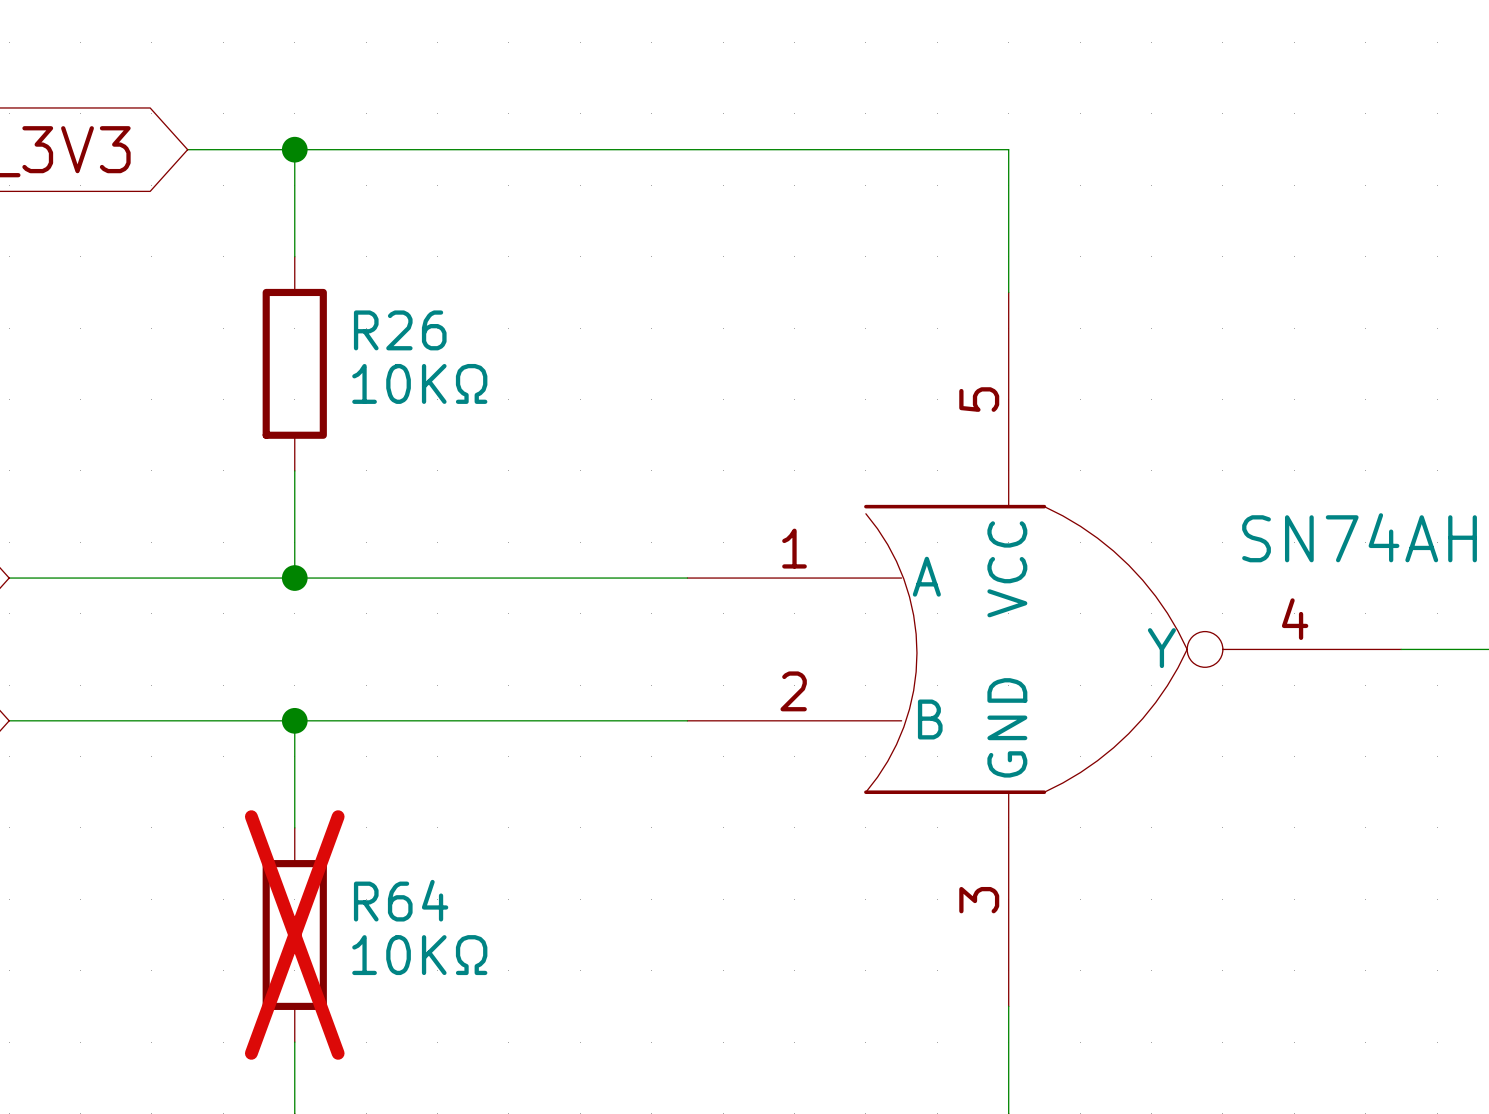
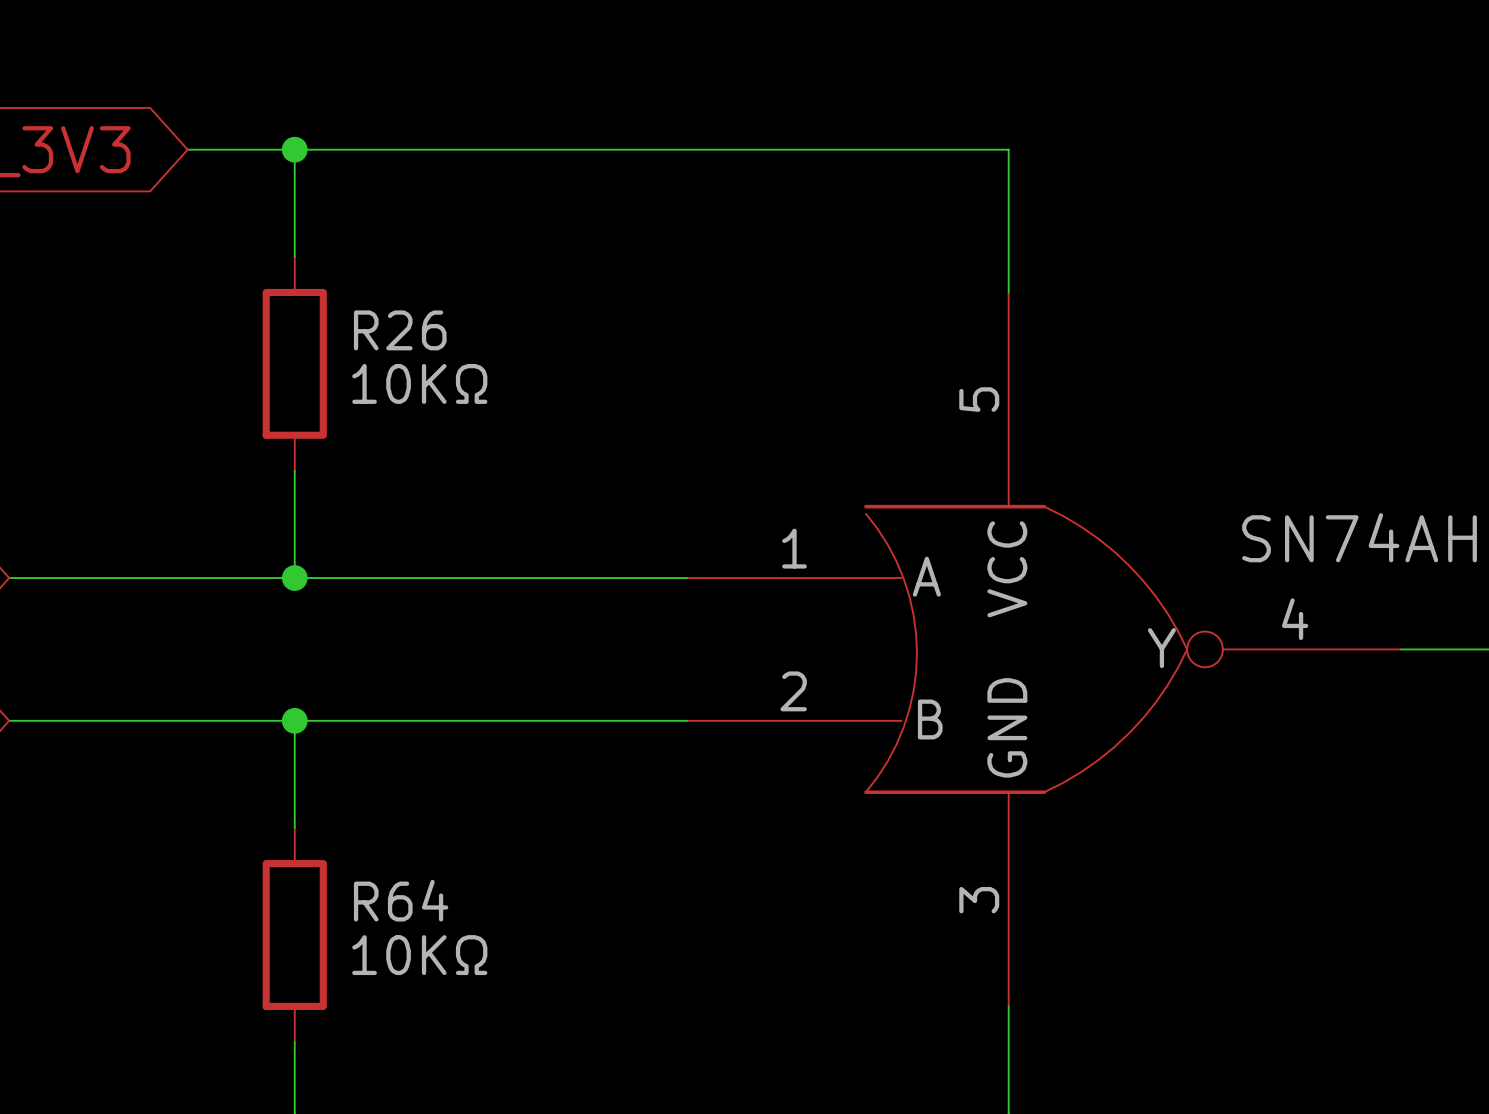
R64 do-not-place cross: (294, 935) -> none

